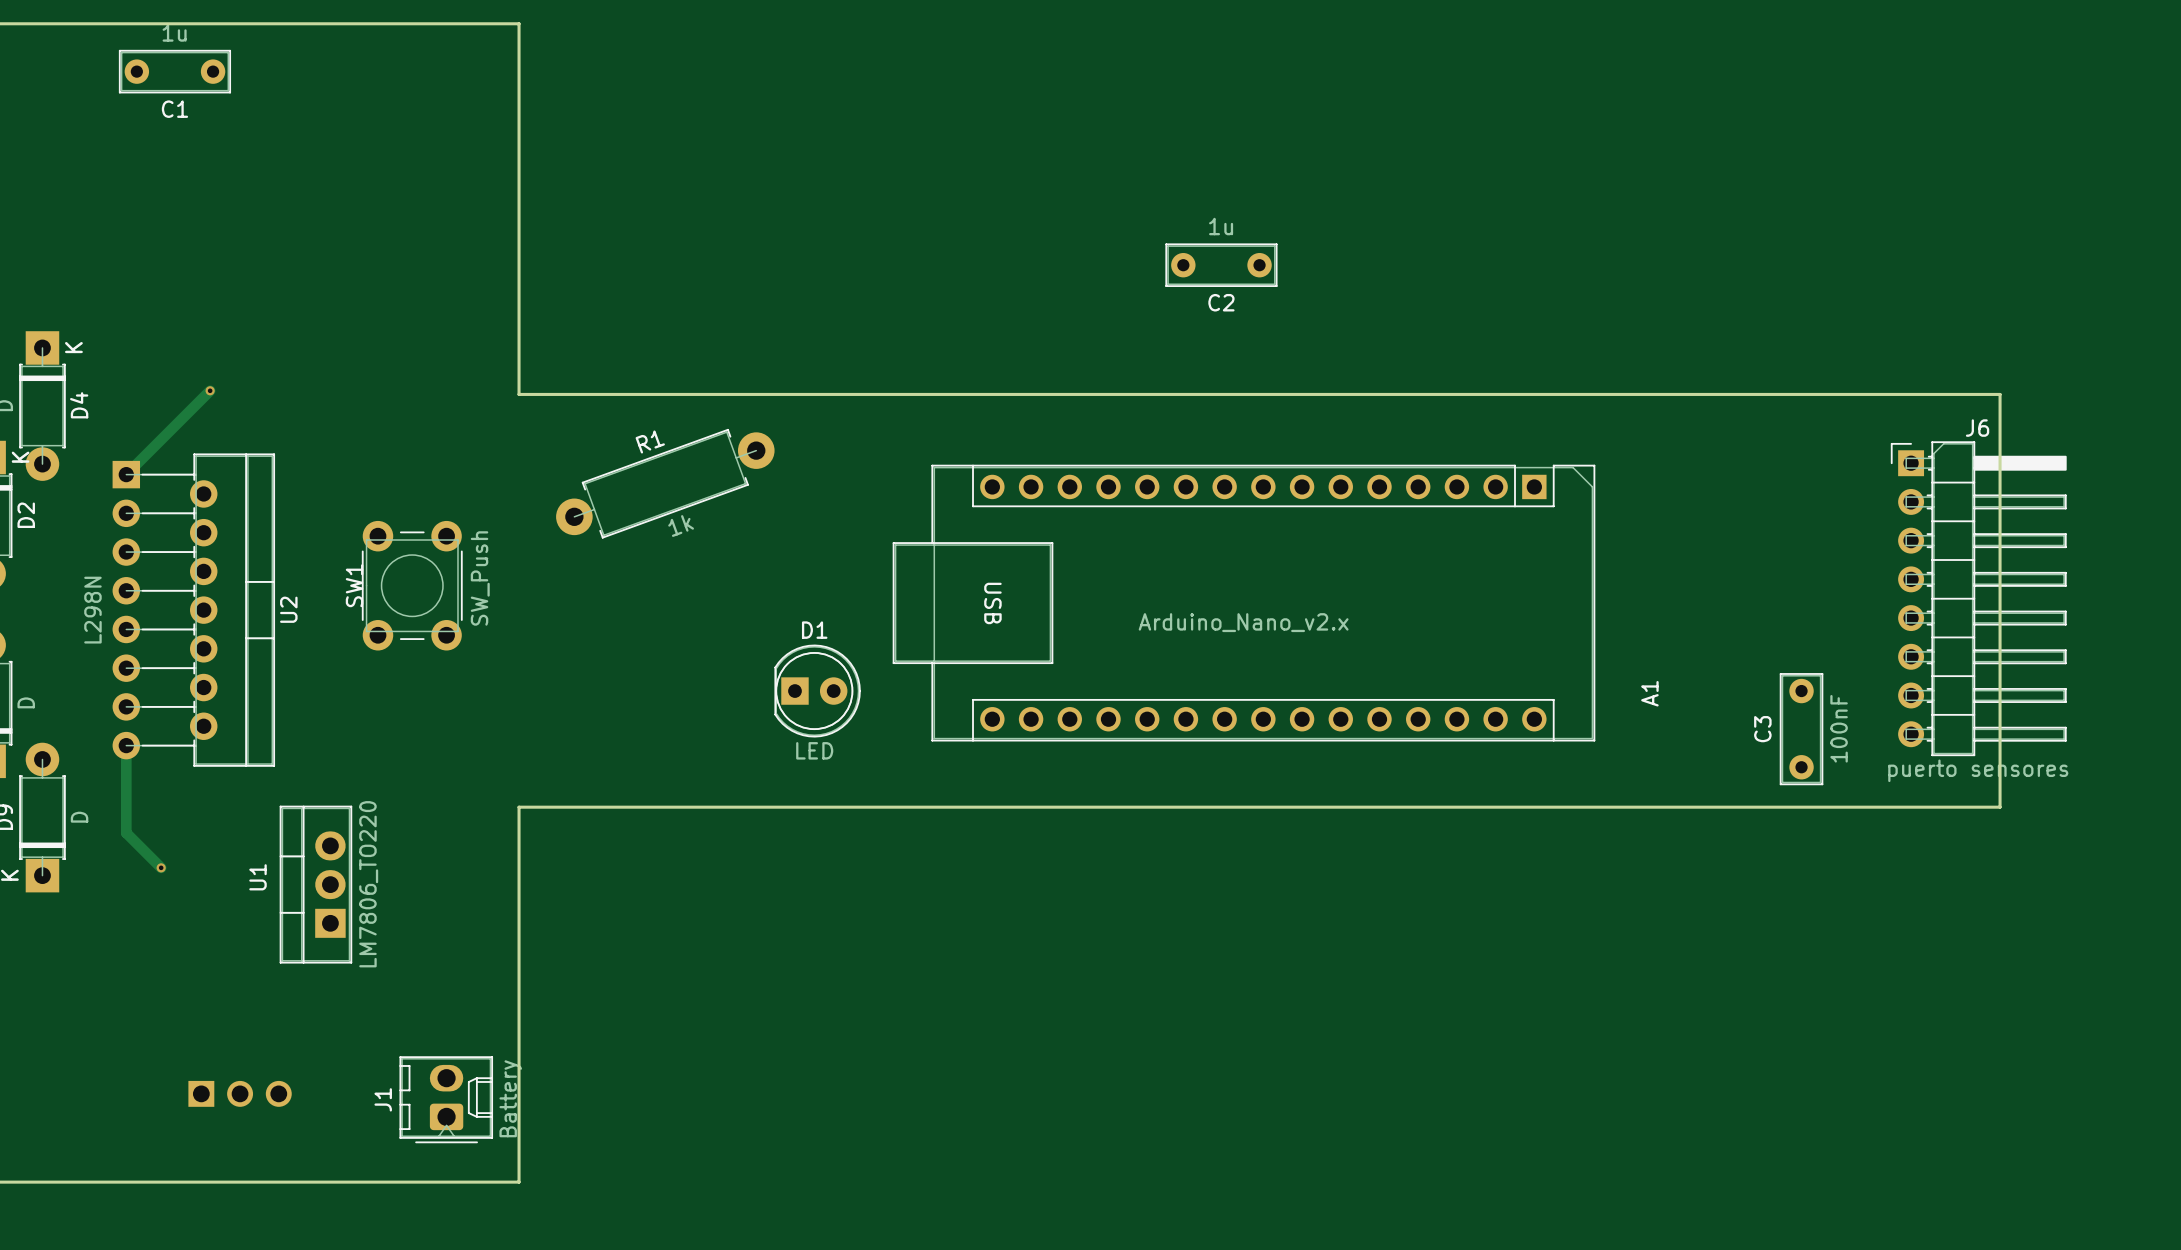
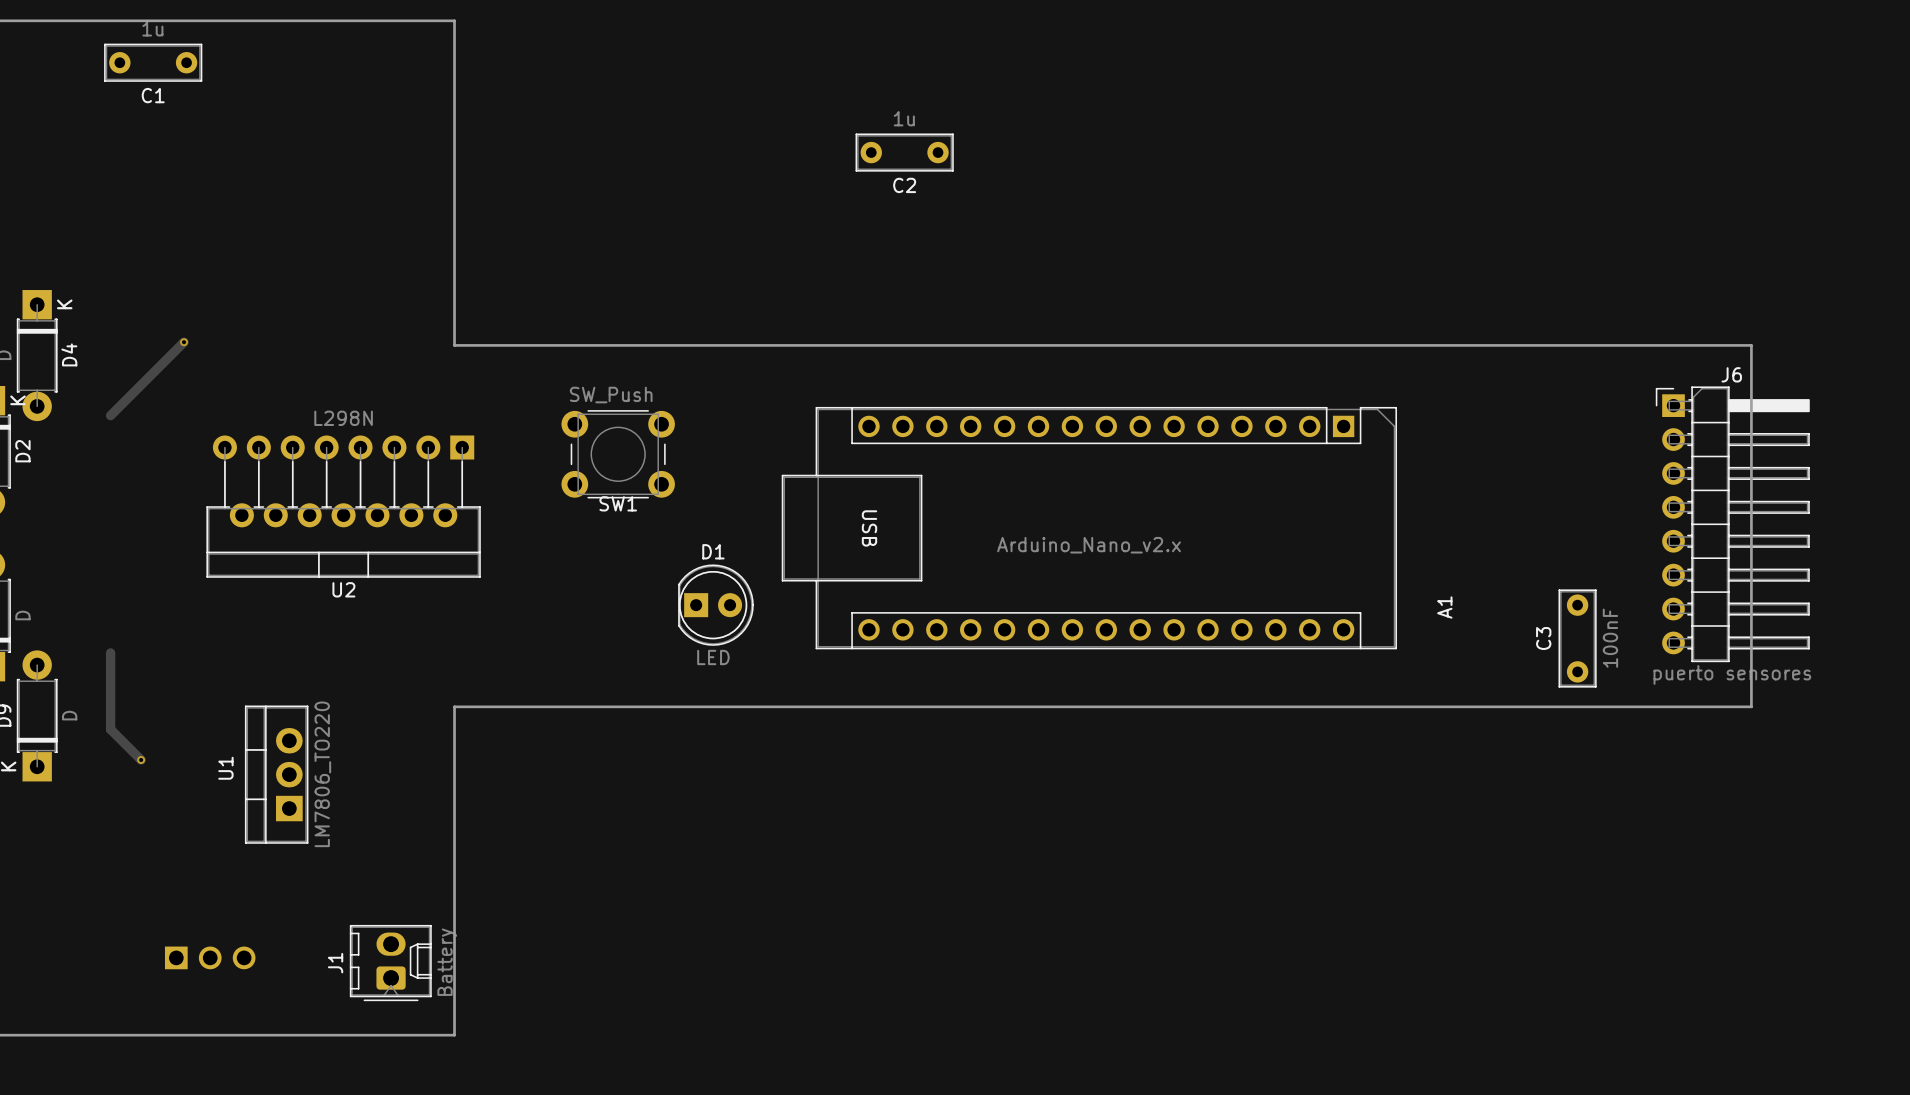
C2 position: (1221, 265) -> (904, 152)
U2 footprint: [112, 453, 276, 767] -> [206, 435, 481, 578]
R1: 1k (665, 483) -> none
SW1 rotation: 0° (412, 585) -> 90° counterclockwise (618, 454)
SW1 position: (412, 585) -> (618, 454)
U2 name position: U2 (288, 609) -> U2 (343, 589)
U2 value position: L298N (92, 610) -> L298N (343, 418)

